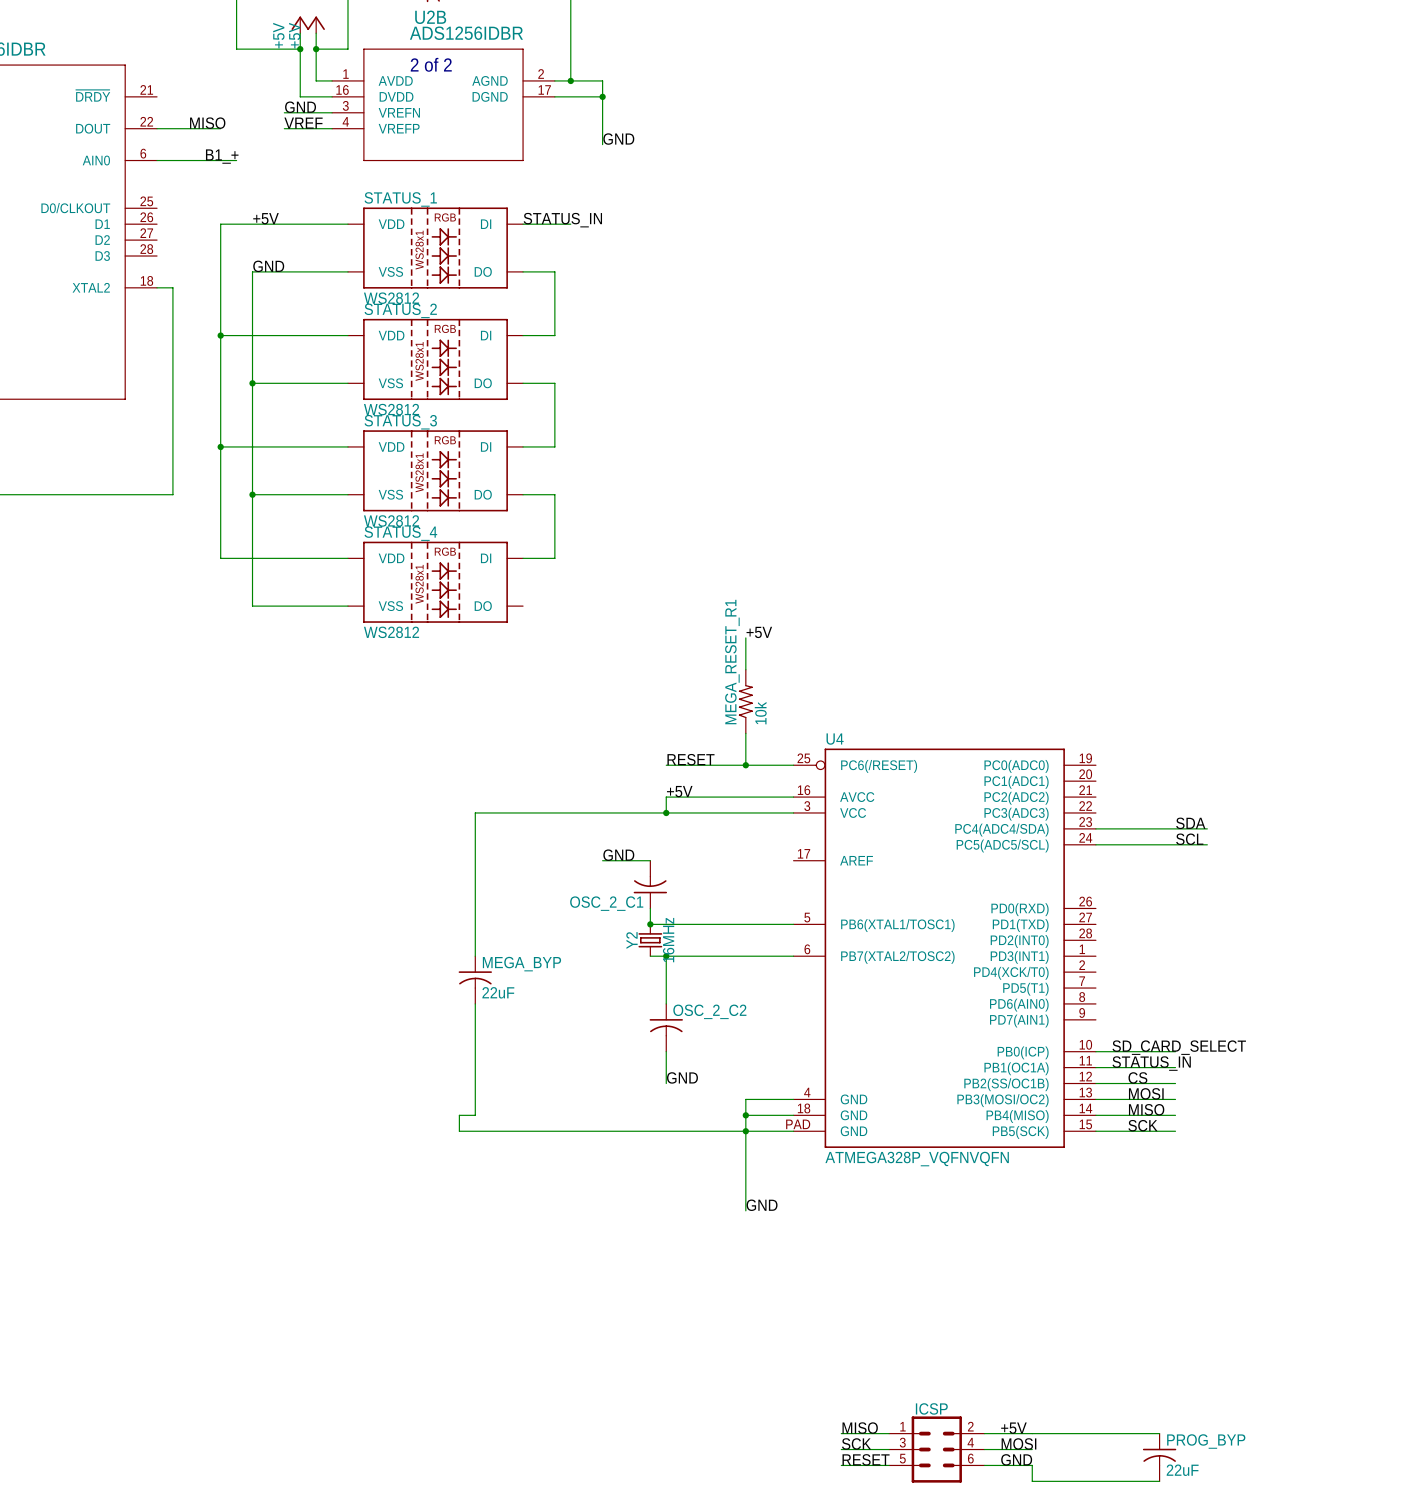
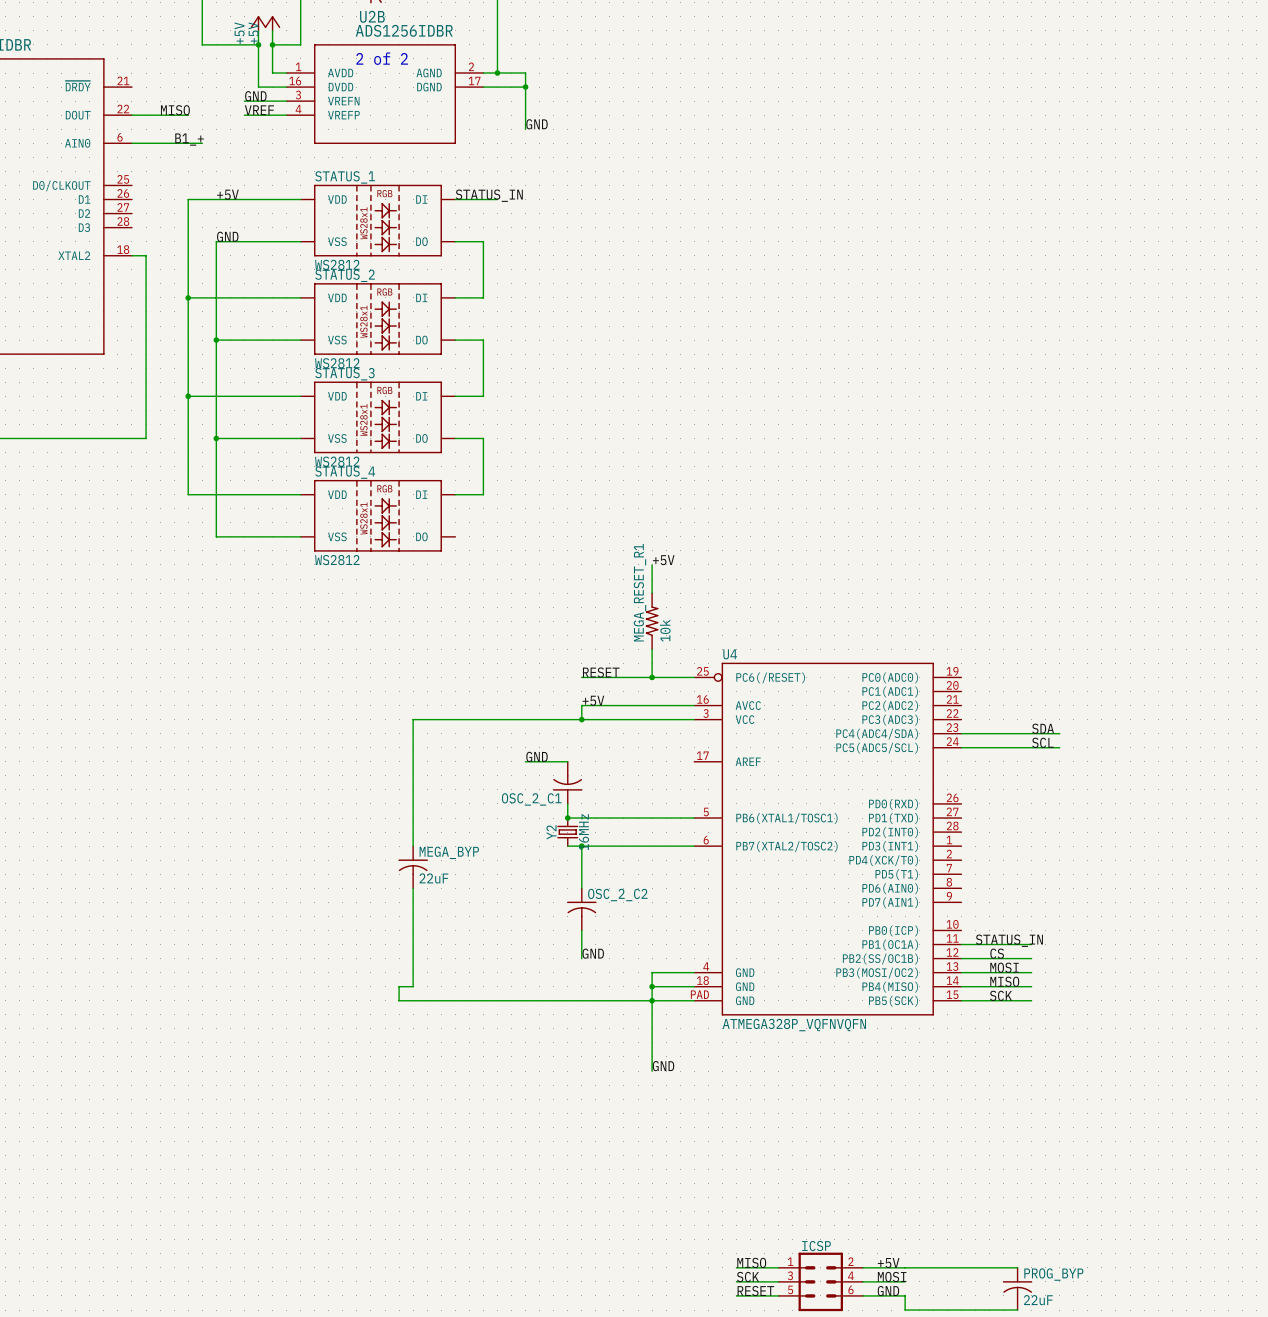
label: SD_CARD_SELECT (1179, 1047) -> none
wire: (1095, 1051) (1175, 1051) -> none

